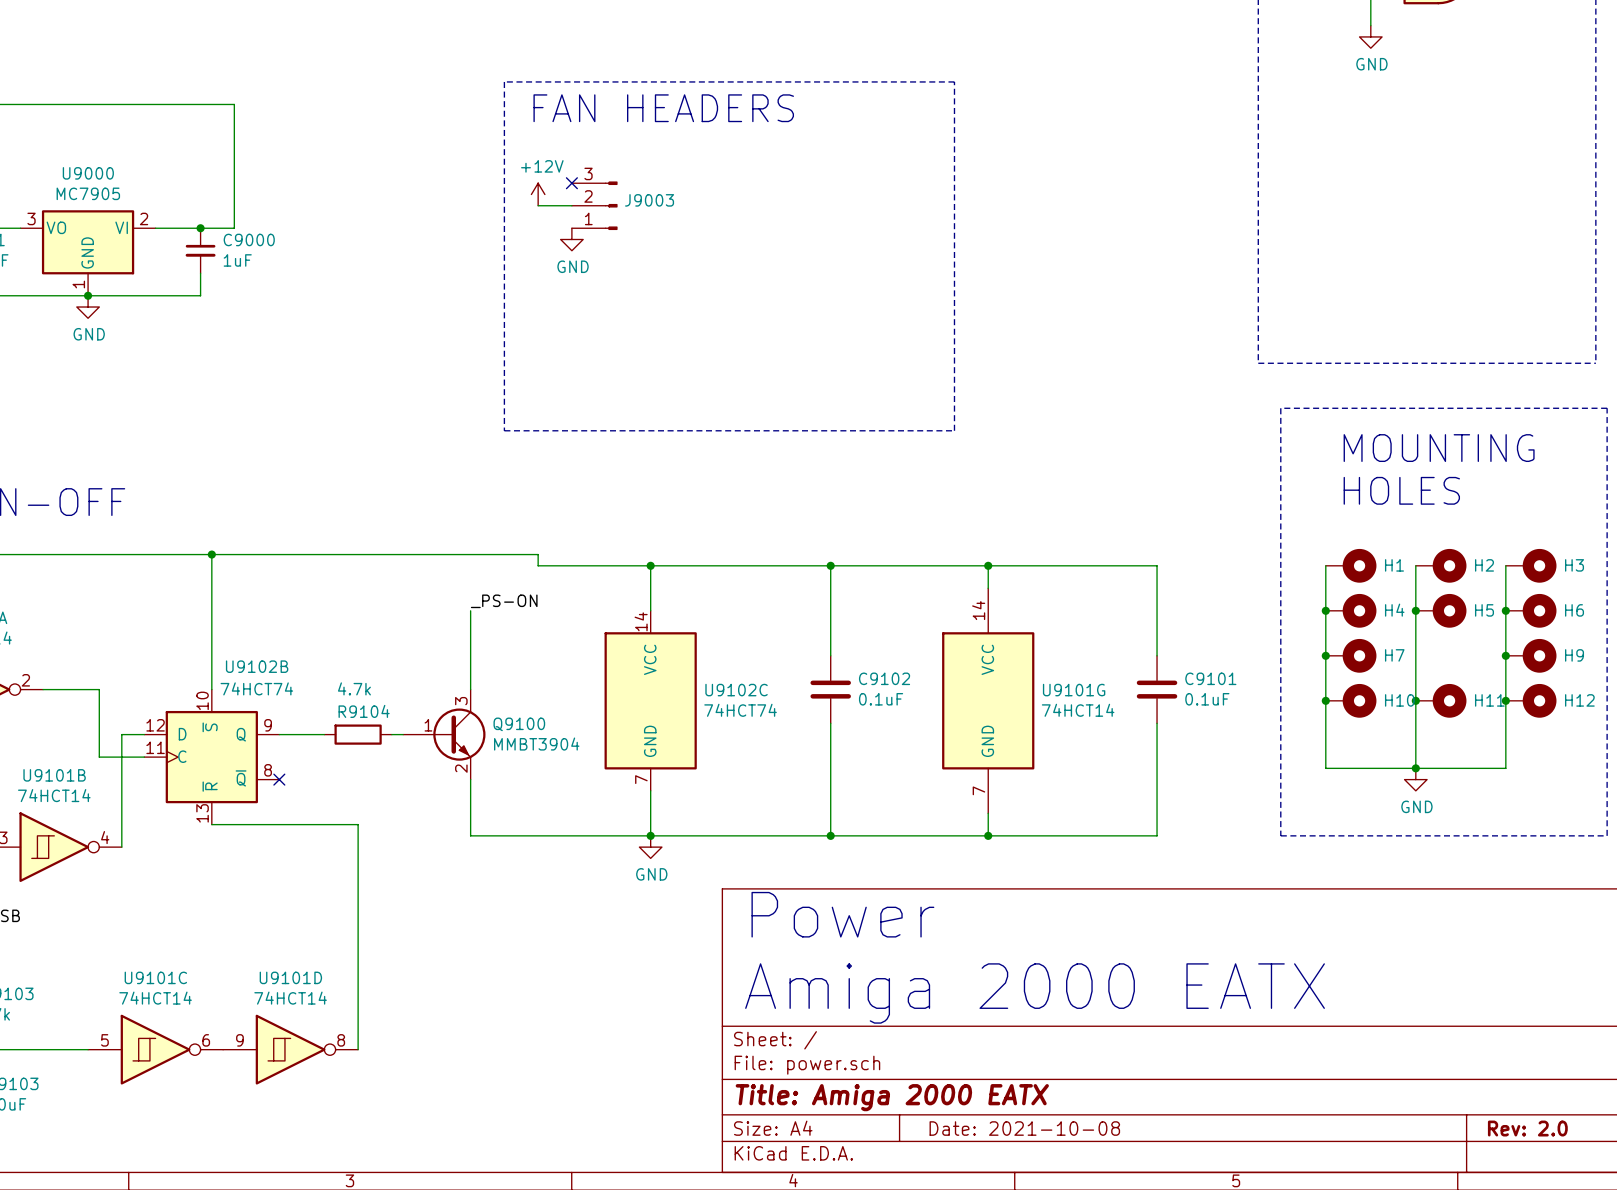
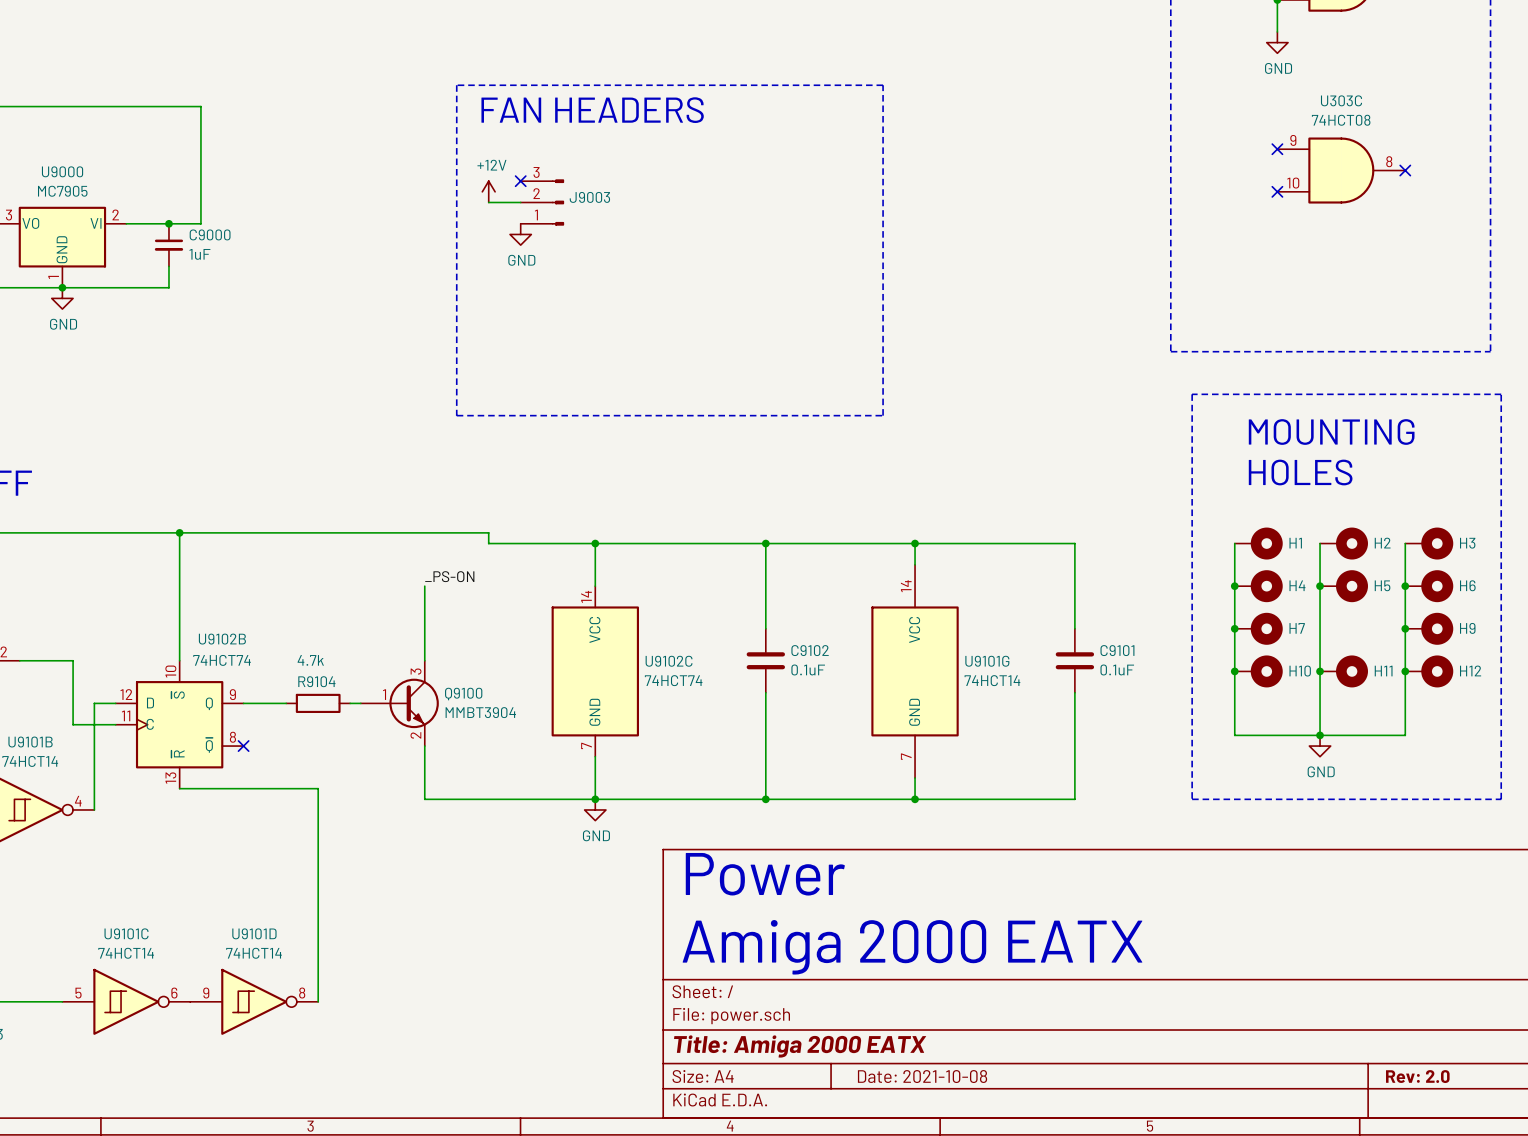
no-connect mark: none -> (1277, 149)
U303C: none -> 74HCT08 (1341, 170)
no-connect mark: none -> (1405, 170)
no-connect mark: none -> (1277, 191)

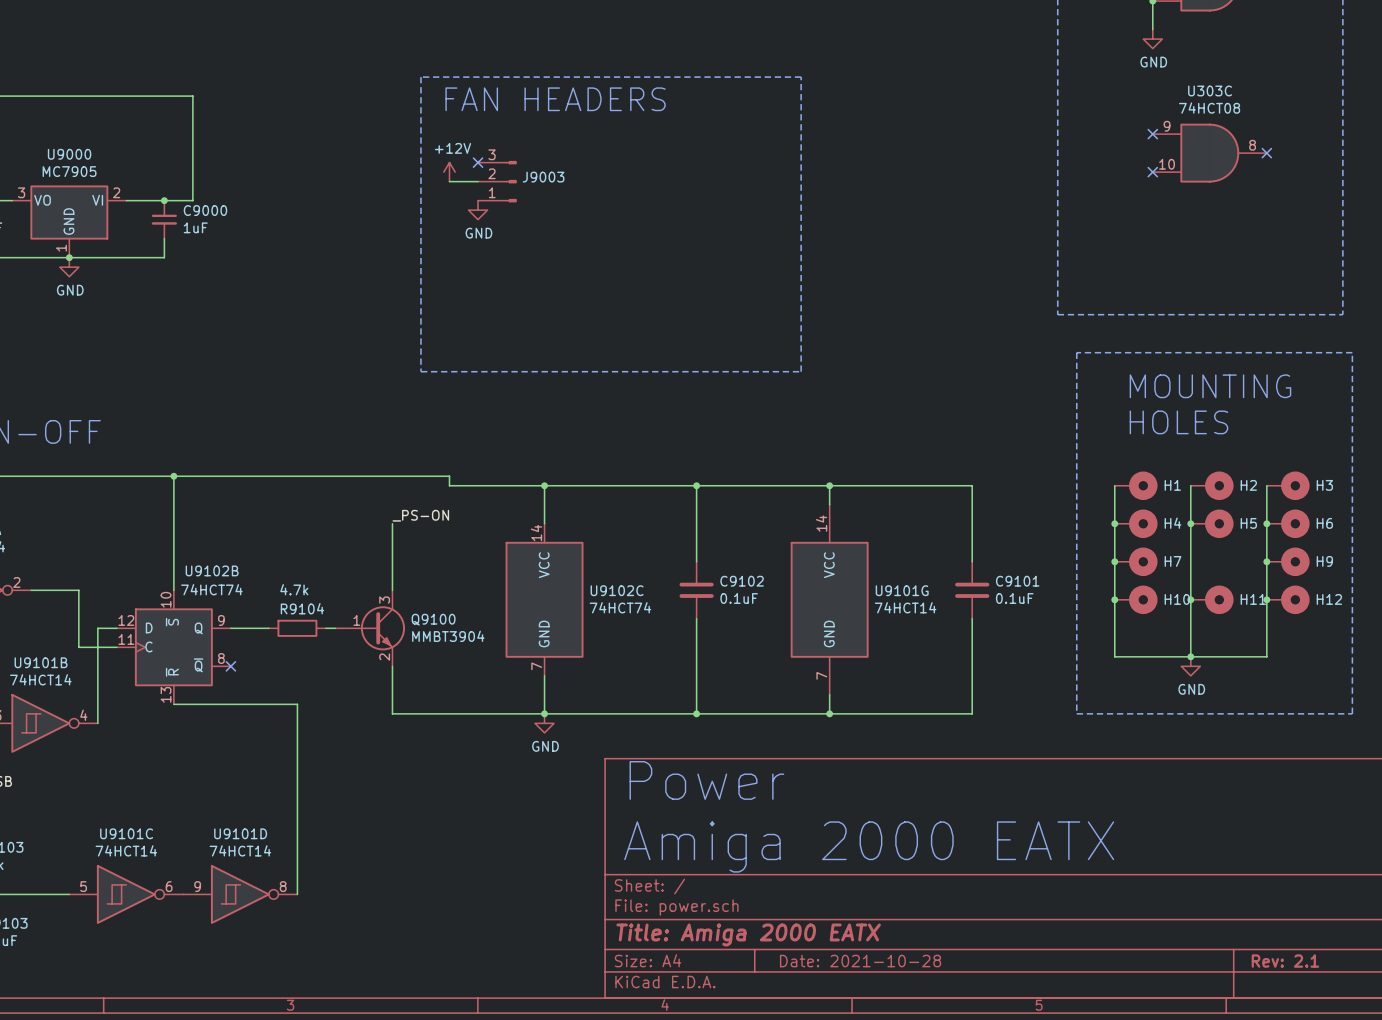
title block: Date: 2021-10-08 (922, 1076) -> Date: 2021-10-28 (860, 961)
title block: Rev: 2.0 (1417, 1076) -> Rev: 2.1 (1285, 961)

